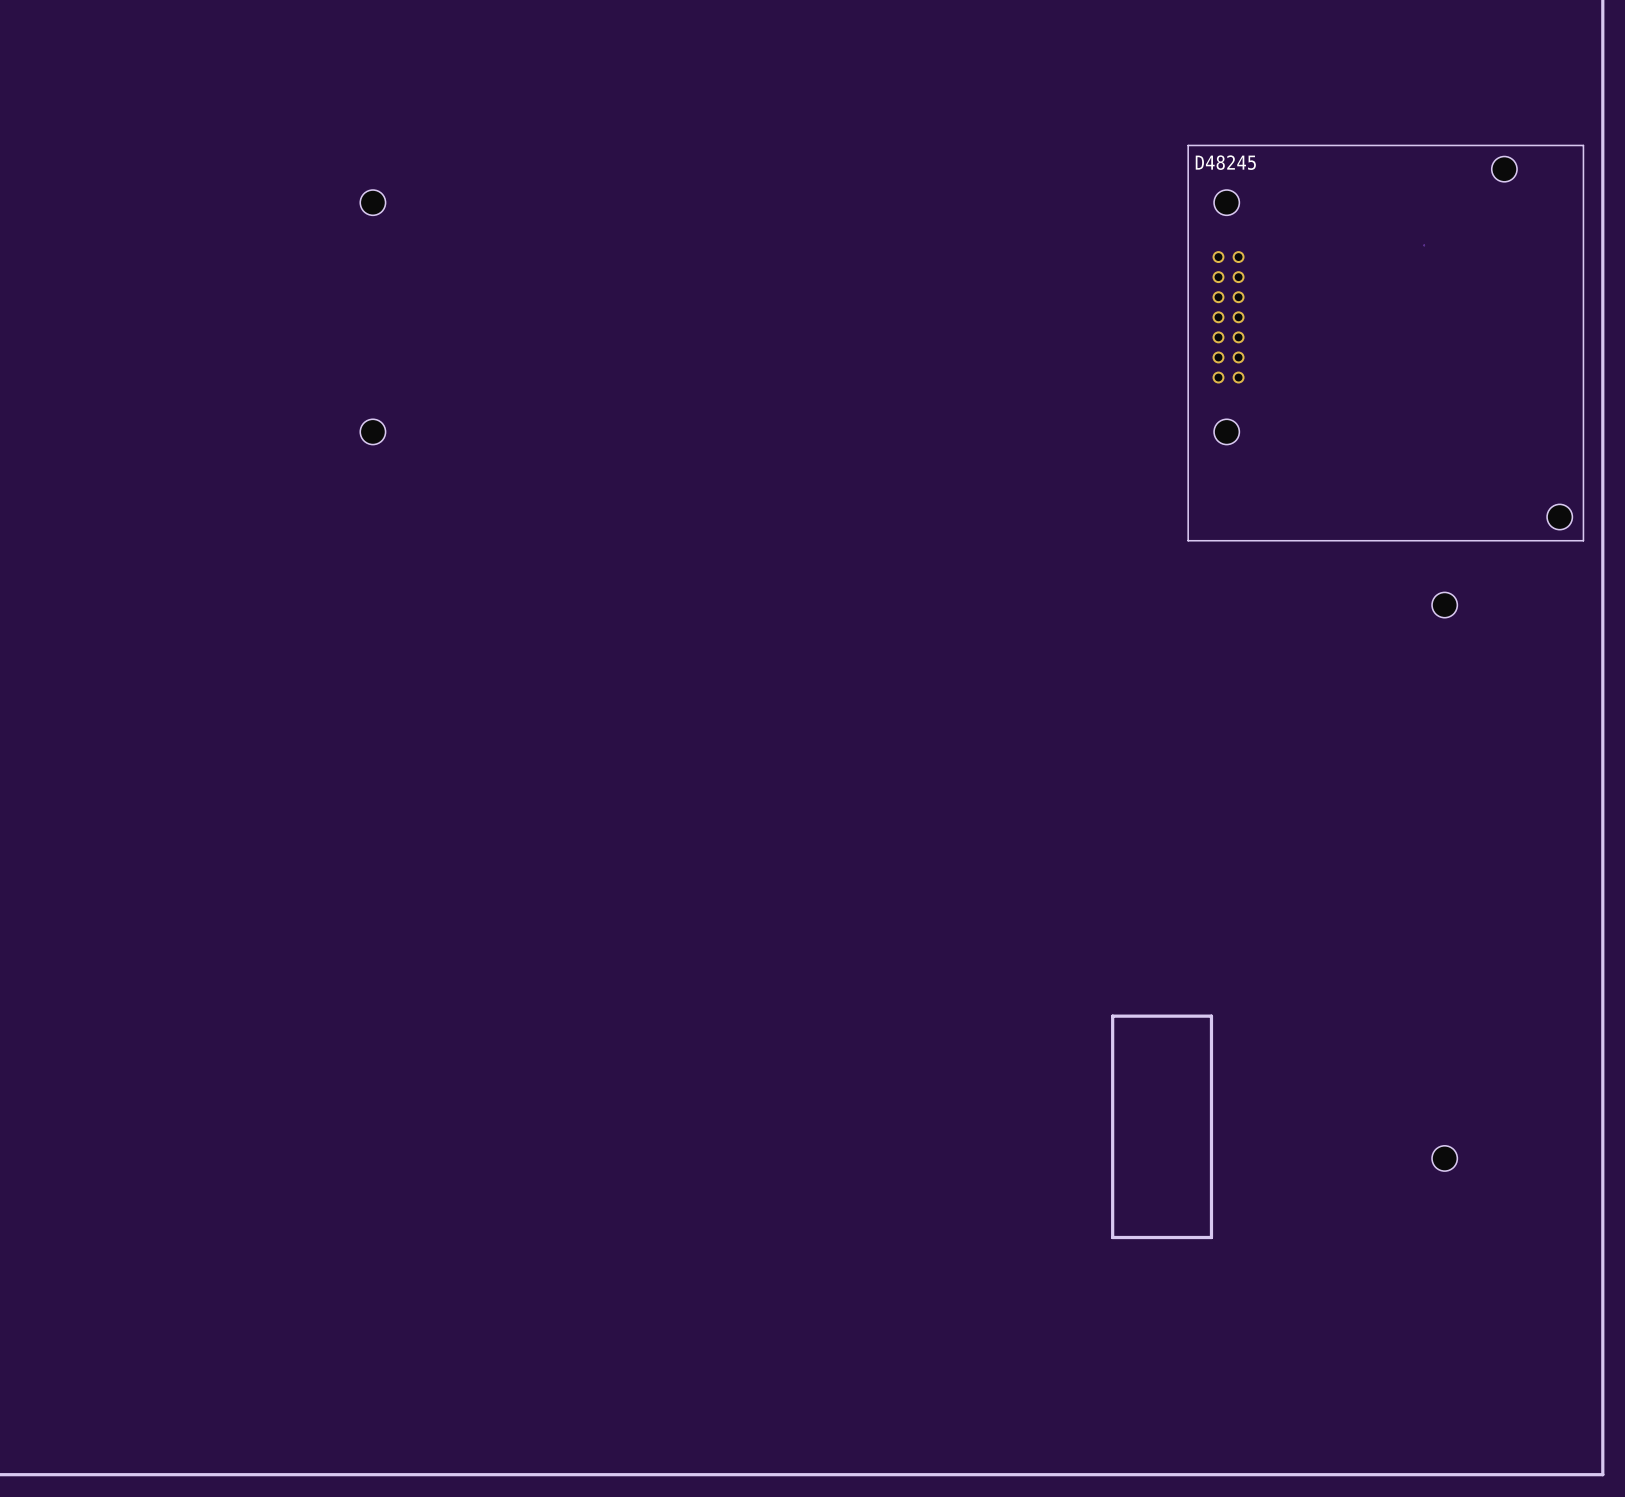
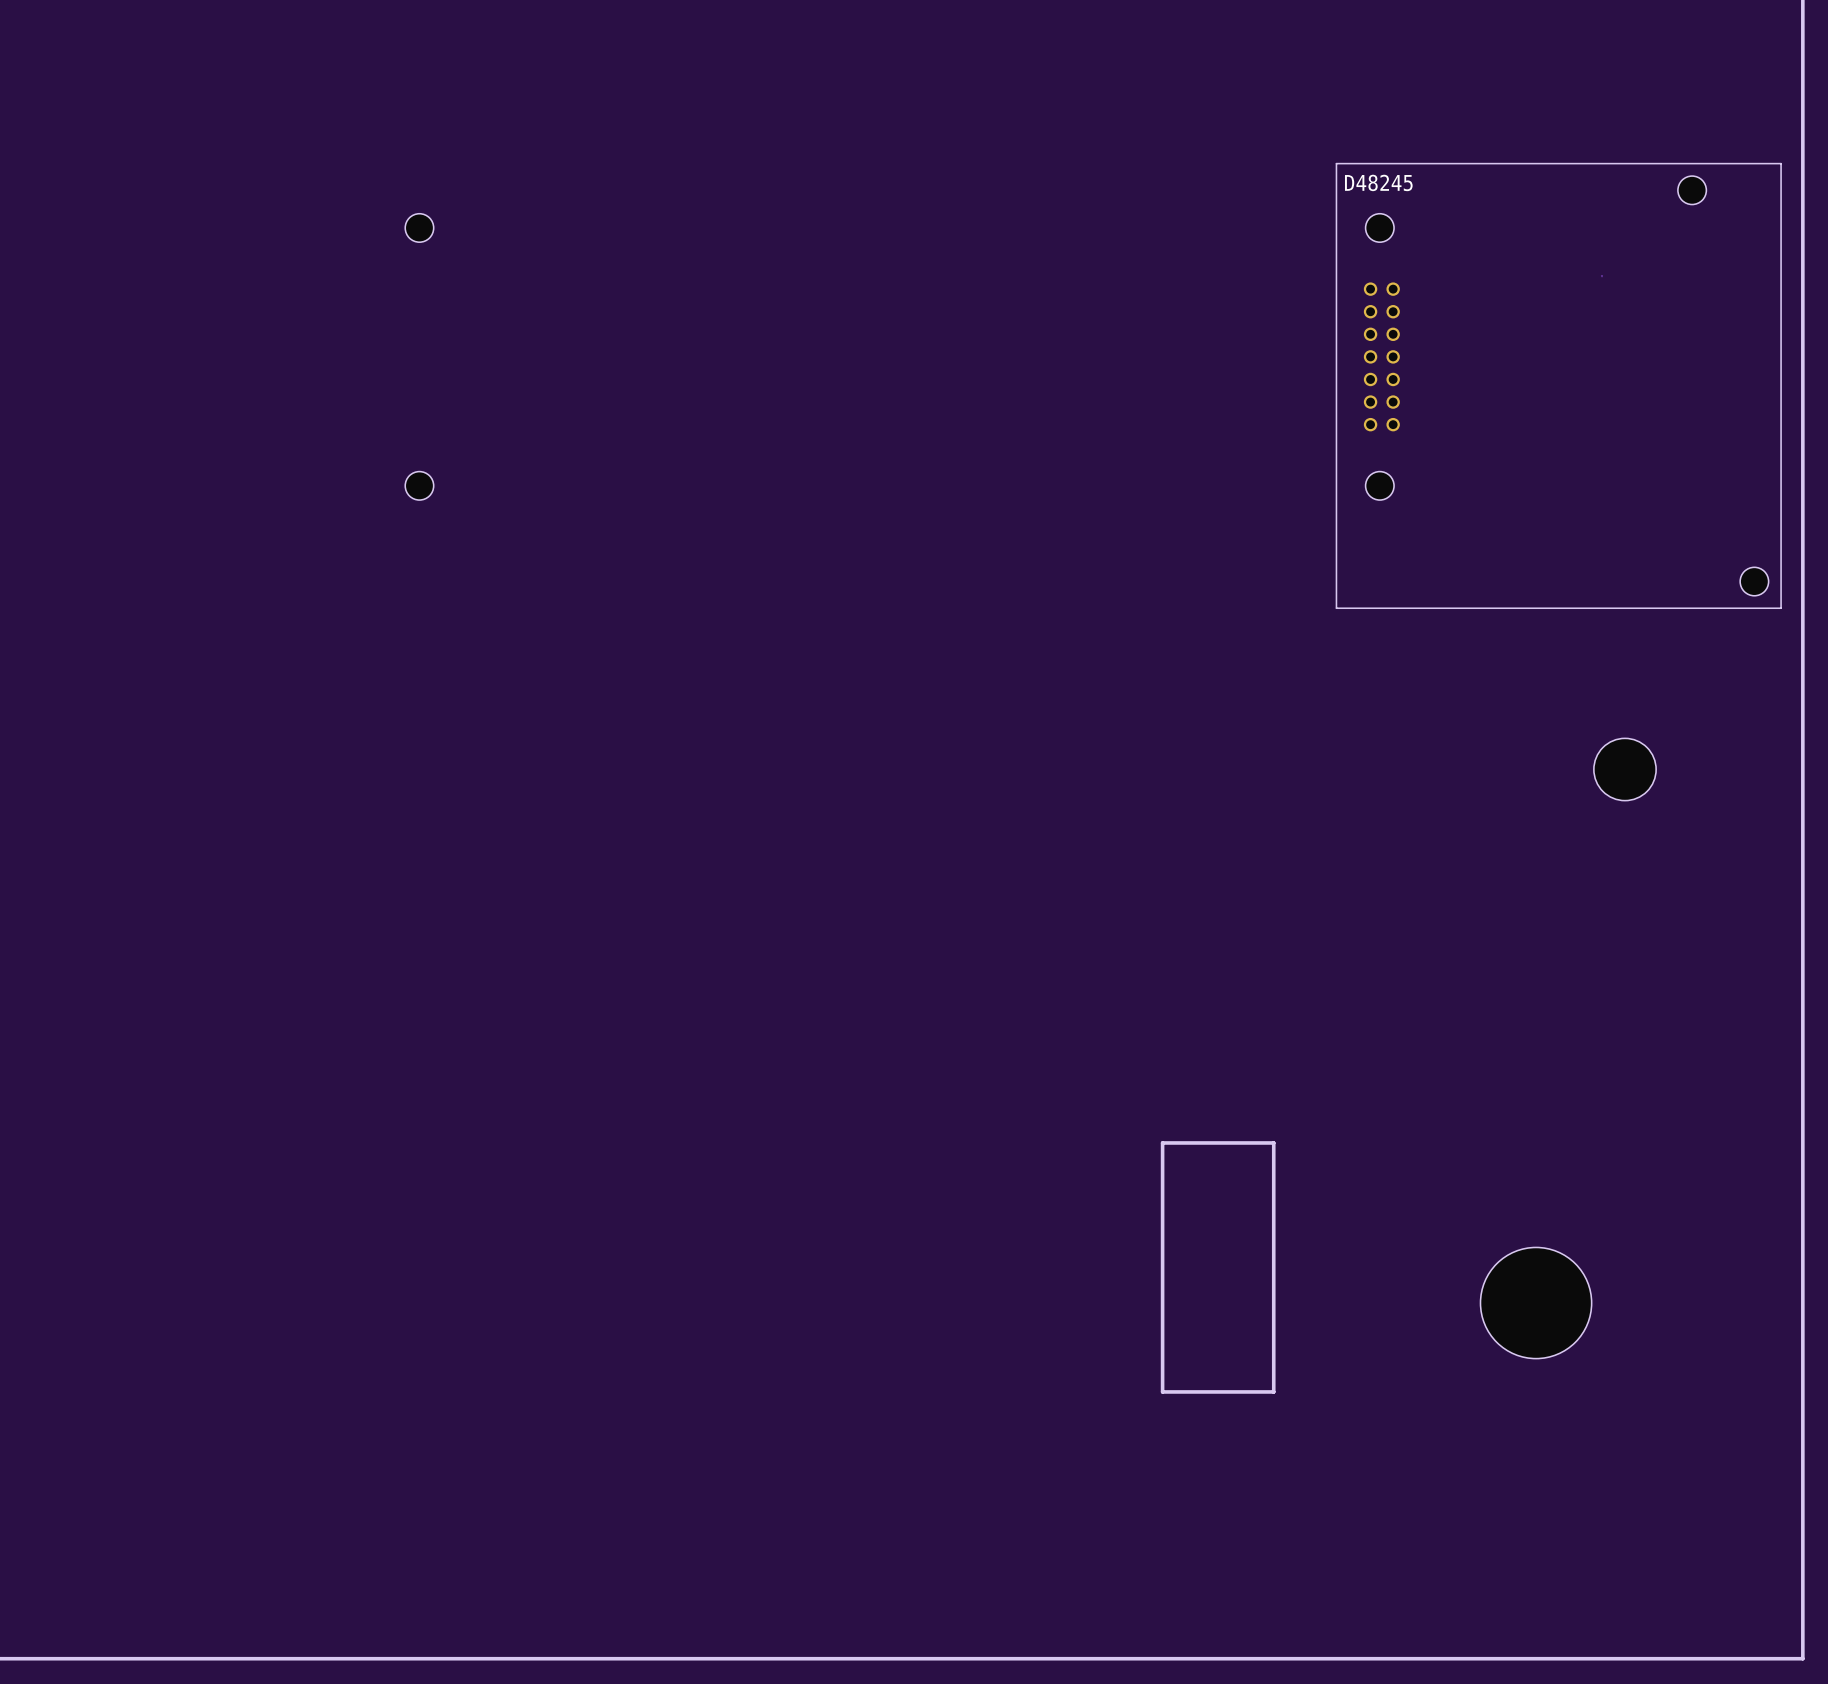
hole: (1444, 605) -> none
hole: none -> (1624, 769)
board edge: (1112, 1016) (1112, 1237) -> (1251, 1142) (1162, 1142) (1162, 1391) (1251, 1391)
board edge: (1132, 1016) (1211, 1016) (1211, 1237) (1132, 1237) -> (1273, 1142) (1273, 1391)
hole: none -> (1536, 1303)
hole: (1444, 1158) -> none

